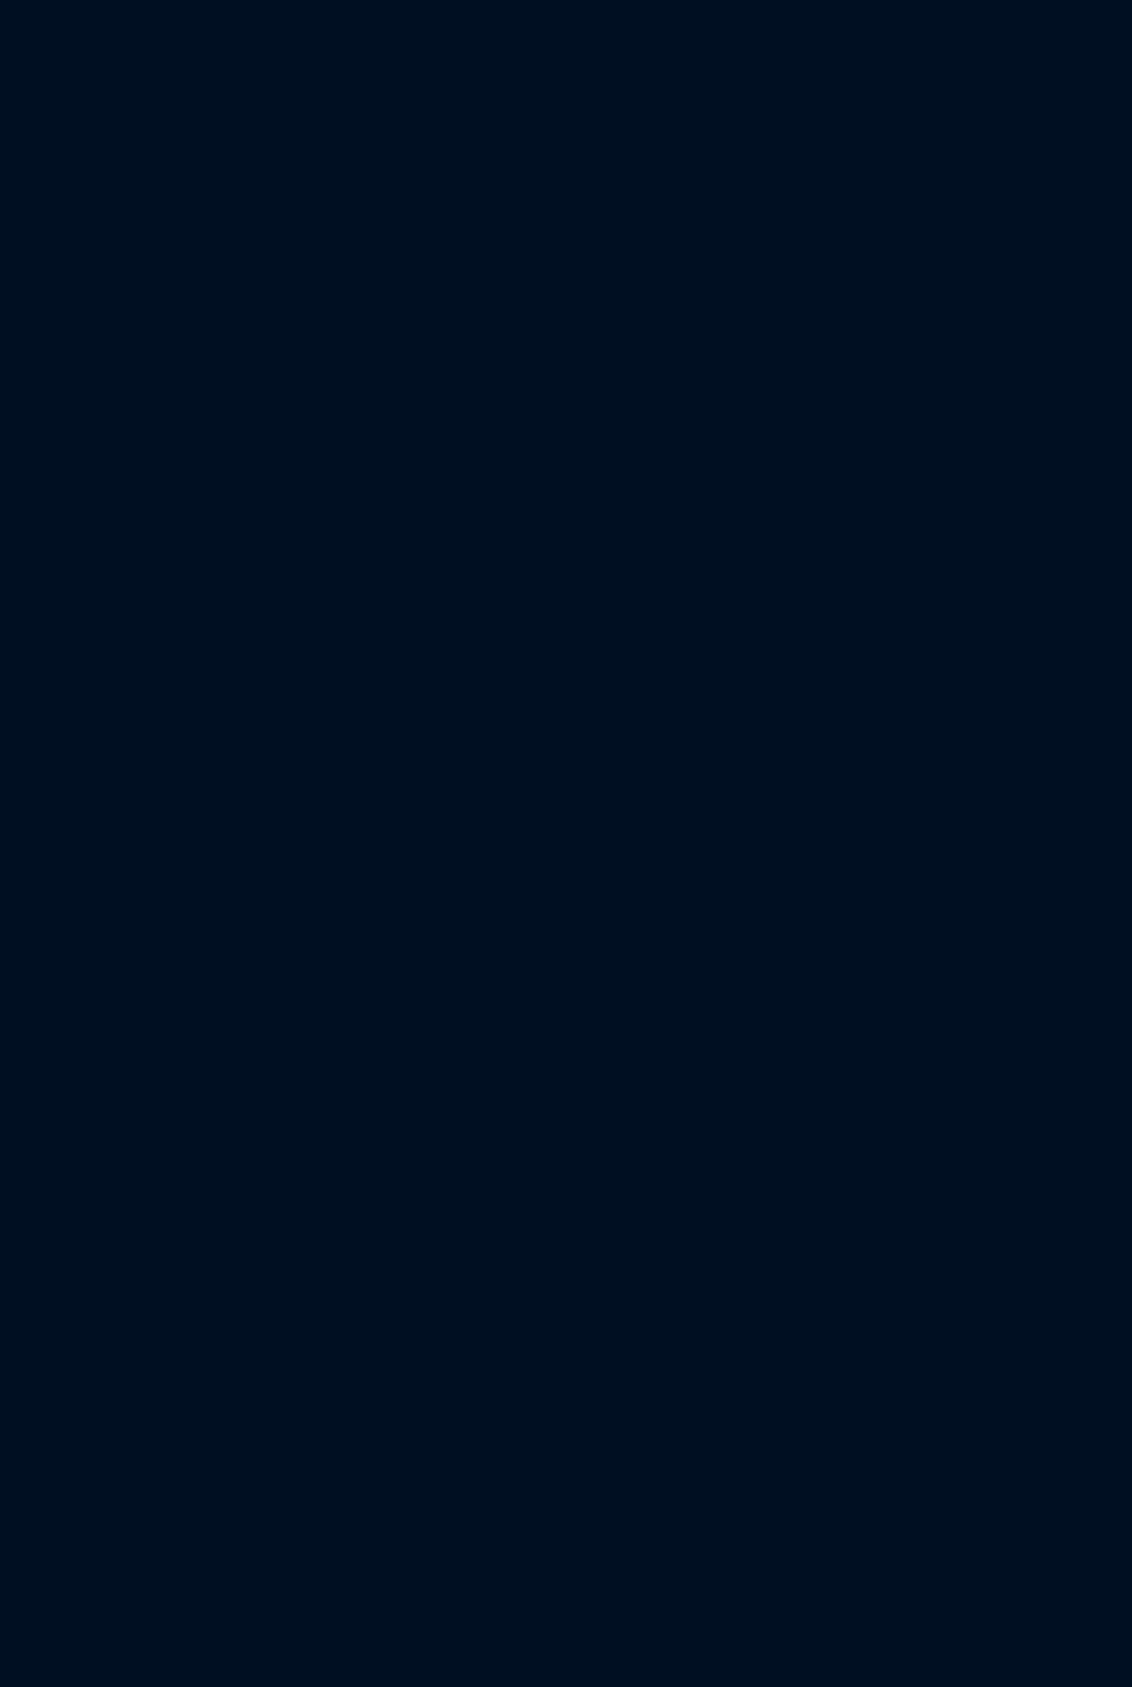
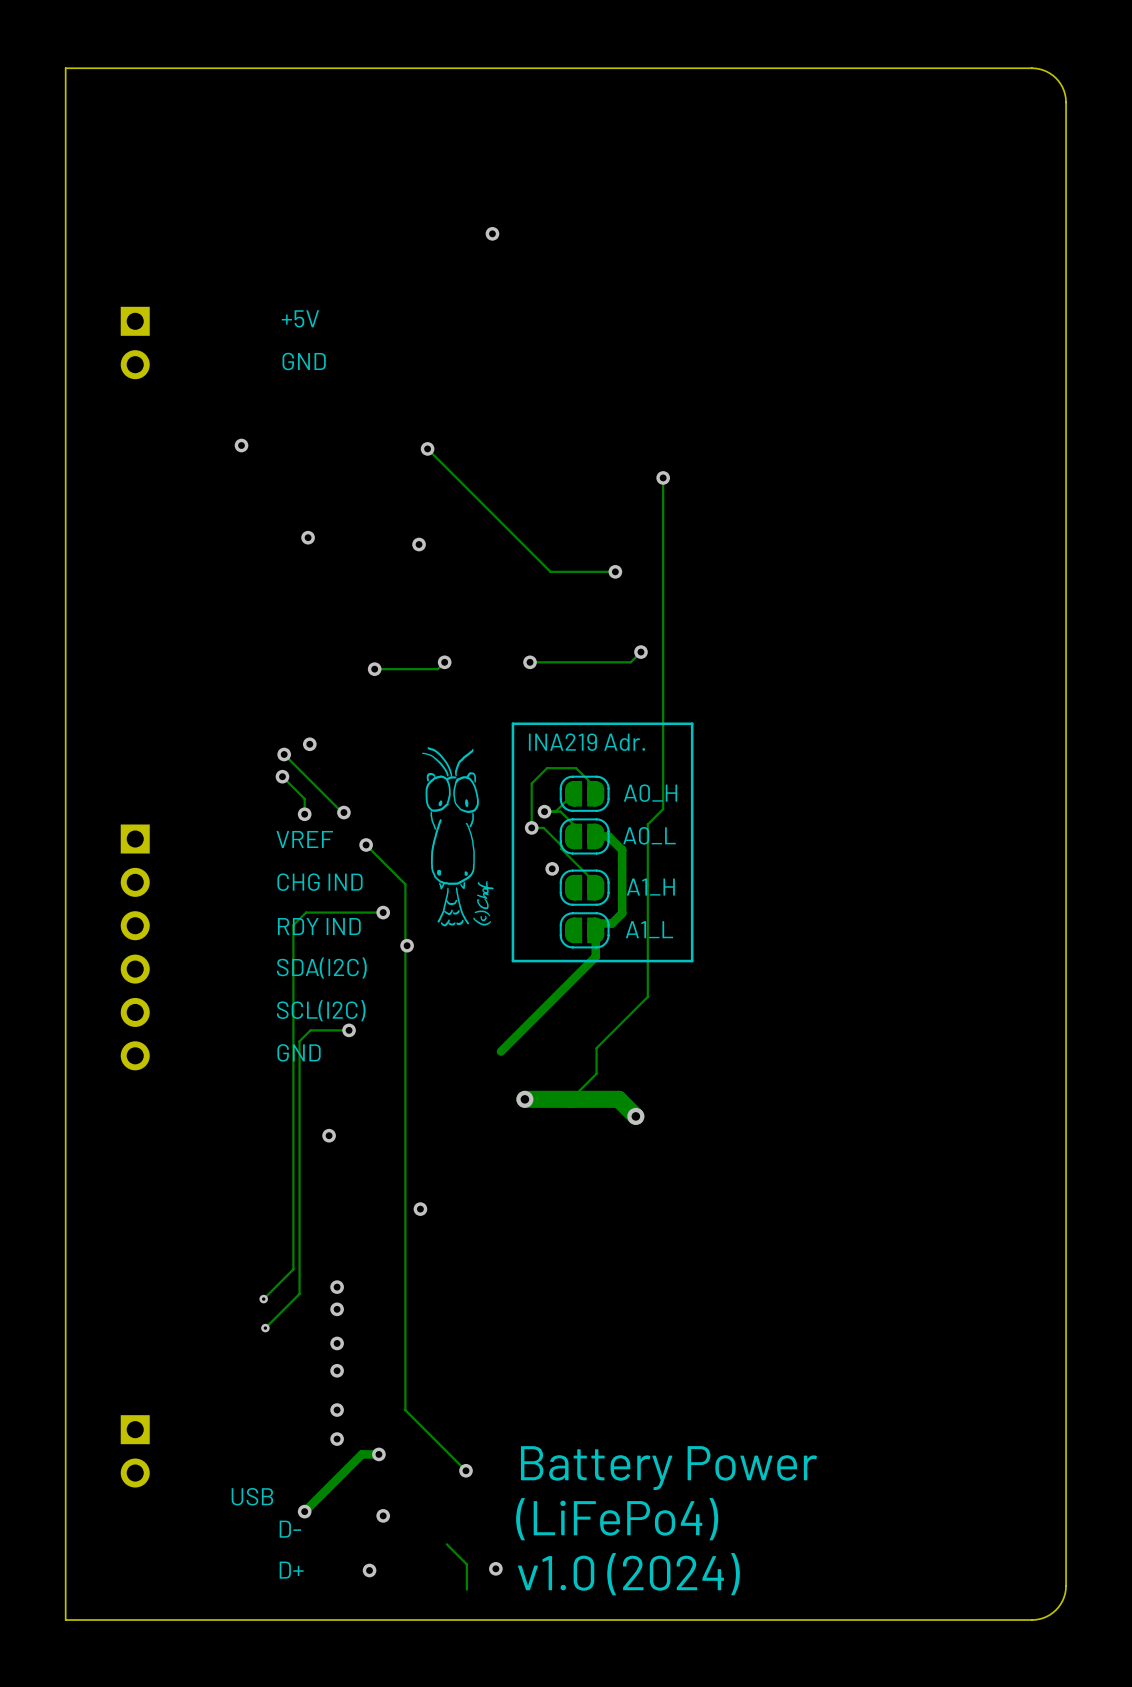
board edge: none -> (1031, 68) (65, 68) (65, 1620) (1031, 1620) (1046, 1616) (1060, 1604) (1066, 1585) (1066, 102) (1064, 91) (1056, 78) (1043, 70) (1031, 68)
via: none -> (492, 233)
text: none -> +5V (300, 318)
part: none -> (135, 342)
text: none -> GND (304, 361)
via: none -> (241, 445)
track: none -> (427, 448) (550, 571) (615, 571)
via: none -> (427, 448)
track: none -> (663, 477) (663, 809) (647, 824) (647, 996) (596, 1048) (596, 1073) (570, 1099)
via: none -> (663, 477)
via: none -> (308, 537)
via: none -> (419, 544)
via: none -> (615, 571)
track: none -> (640, 652) (630, 662) (530, 662)
via: none -> (640, 652)
track: none -> (444, 662) (437, 669) (374, 669)
via: none -> (444, 662)
via: none -> (530, 662)
via: none -> (374, 669)
line: none -> (692, 723) (512, 723) (512, 961) (692, 961) (692, 723)
text: none -> INA219 Adr. (587, 742)
via: none -> (309, 744)
drawing: none -> [422, 747, 494, 927]
track: none -> (284, 754) (343, 812)
via: none -> (284, 754)
track: none -> (282, 776) (304, 798) (304, 814)
via: none -> (282, 776)
track: none -> (573, 793) (555, 811)
part: none -> A0_H (584, 793)
track: none -> (595, 798) (595, 787) (576, 768) (547, 768) (531, 783) (531, 827) (543, 827) (561, 845) (561, 848) (595, 883) (595, 887)
track: none -> (544, 811) (560, 811) (573, 824) (573, 836)
via: none -> (544, 811)
via: none -> (343, 812)
via: none -> (304, 814)
via: none -> (531, 827)
part: none -> A0_L (584, 836)
track: none -> (595, 836) (608, 836) (622, 850) (622, 913) (611, 923) (595, 923) (595, 956) (500, 1051)
text: none -> VREF (304, 839)
track: none -> (366, 844) (405, 884) (405, 1410) (465, 1470)
via: none -> (366, 844)
via: none -> (552, 868)
text: none -> CHG IND (320, 882)
part: none -> A1_H (584, 887)
track: none -> (383, 912) (306, 912) (293, 925) (293, 1269) (263, 1299)
via: none -> (383, 912)
text: none -> RDY IND (319, 926)
part: none -> A1_L (584, 930)
via: none -> (407, 945)
part: none -> (135, 947)
text: none -> SDA(I2C) (321, 968)
text: none -> SCL(I2C) (321, 1010)
track: none -> (349, 1030) (310, 1030) (299, 1041) (299, 1293) (265, 1328)
via: none -> (349, 1030)
text: none -> GND (299, 1052)
track: none -> (524, 1099) (618, 1099) (635, 1116)
via: none -> (524, 1099)
via: none -> (635, 1116)
via: none -> (329, 1135)
via: none -> (420, 1209)
via: none -> (337, 1287)
via: none -> (263, 1299)
via: none -> (337, 1309)
via: none -> (265, 1328)
via: none -> (337, 1343)
via: none -> (337, 1370)
via: none -> (337, 1410)
via: none -> (337, 1439)
part: none -> (135, 1451)
track: none -> (378, 1454) (361, 1454) (304, 1511)
via: none -> (378, 1454)
text: none -> Battery Power (668, 1468)
via: none -> (465, 1470)
text: none -> USB (252, 1496)
via: none -> (304, 1511)
via: none -> (383, 1515)
text: none -> (LiFePo4) (617, 1519)
text: none -> D- (290, 1529)
track: none -> (446, 1544) (466, 1564) (466, 1589)
via: none -> (495, 1568)
text: none -> D+ (291, 1570)
via: none -> (369, 1570)
text: none -> v1.0 (2024) (628, 1574)

